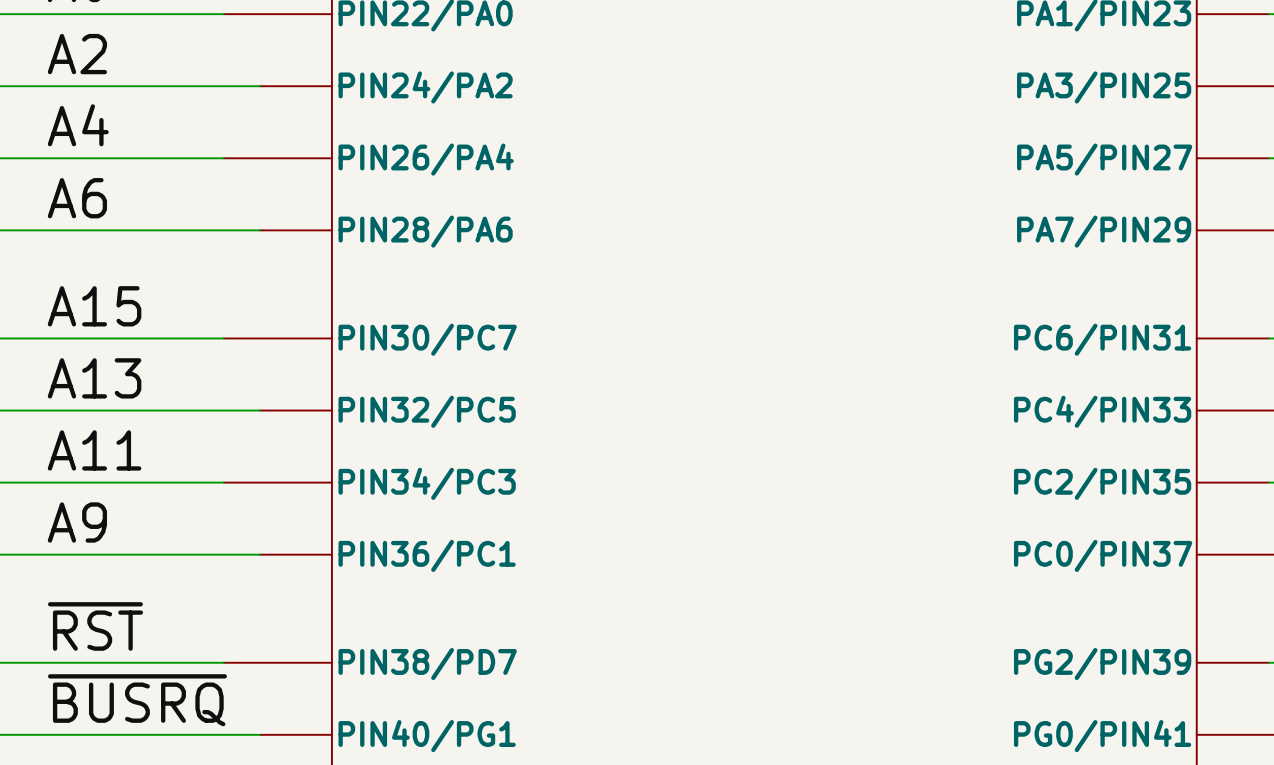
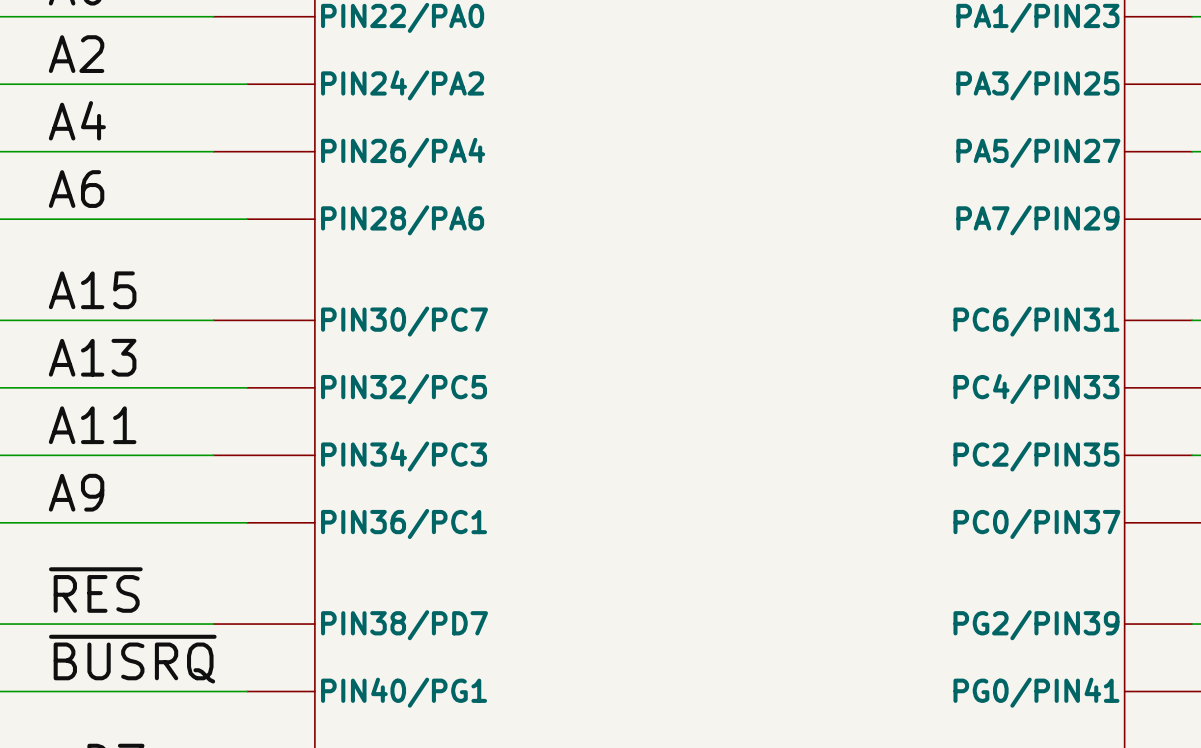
label: ~{RST} (95, 626) -> ~{RES} (95, 590)

